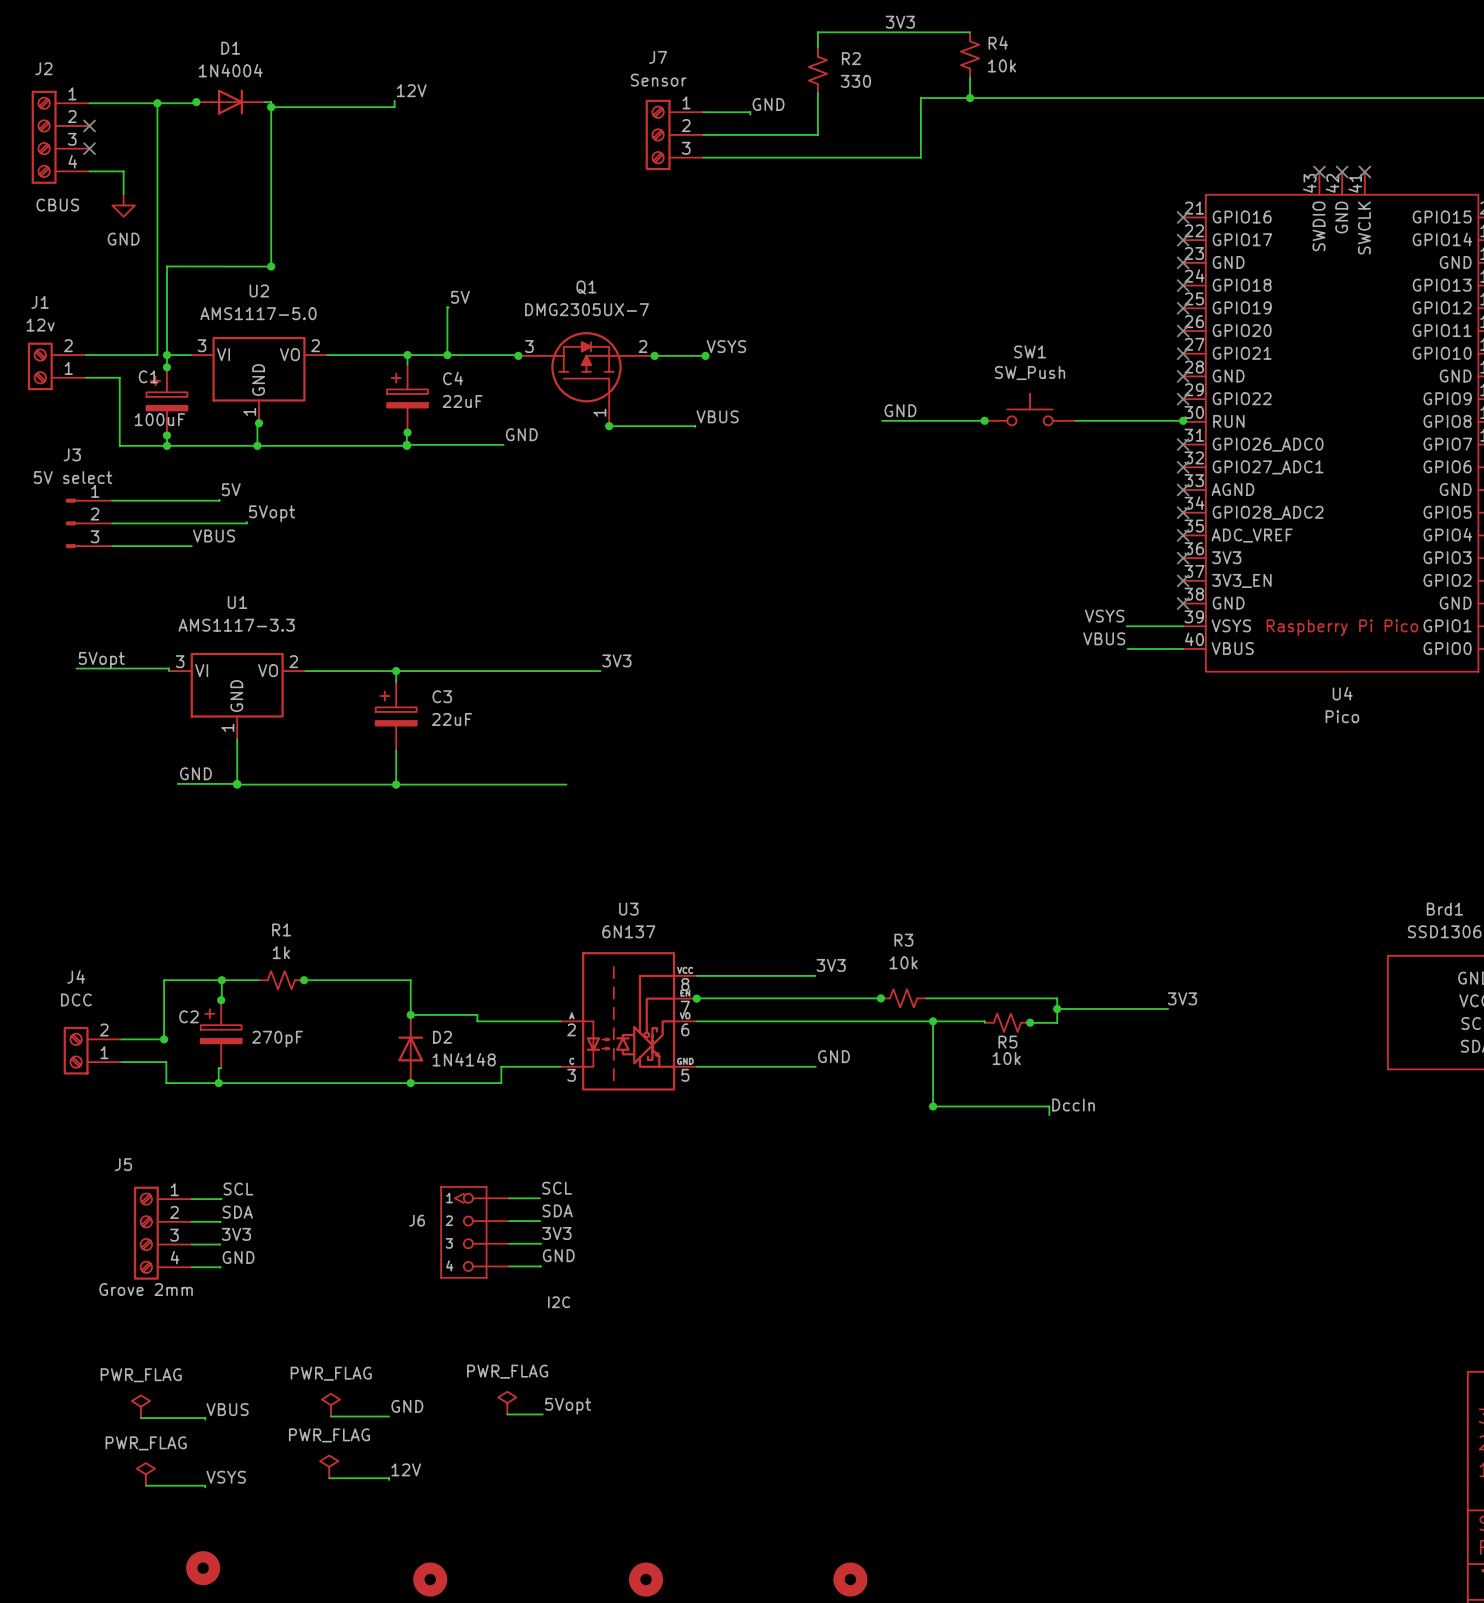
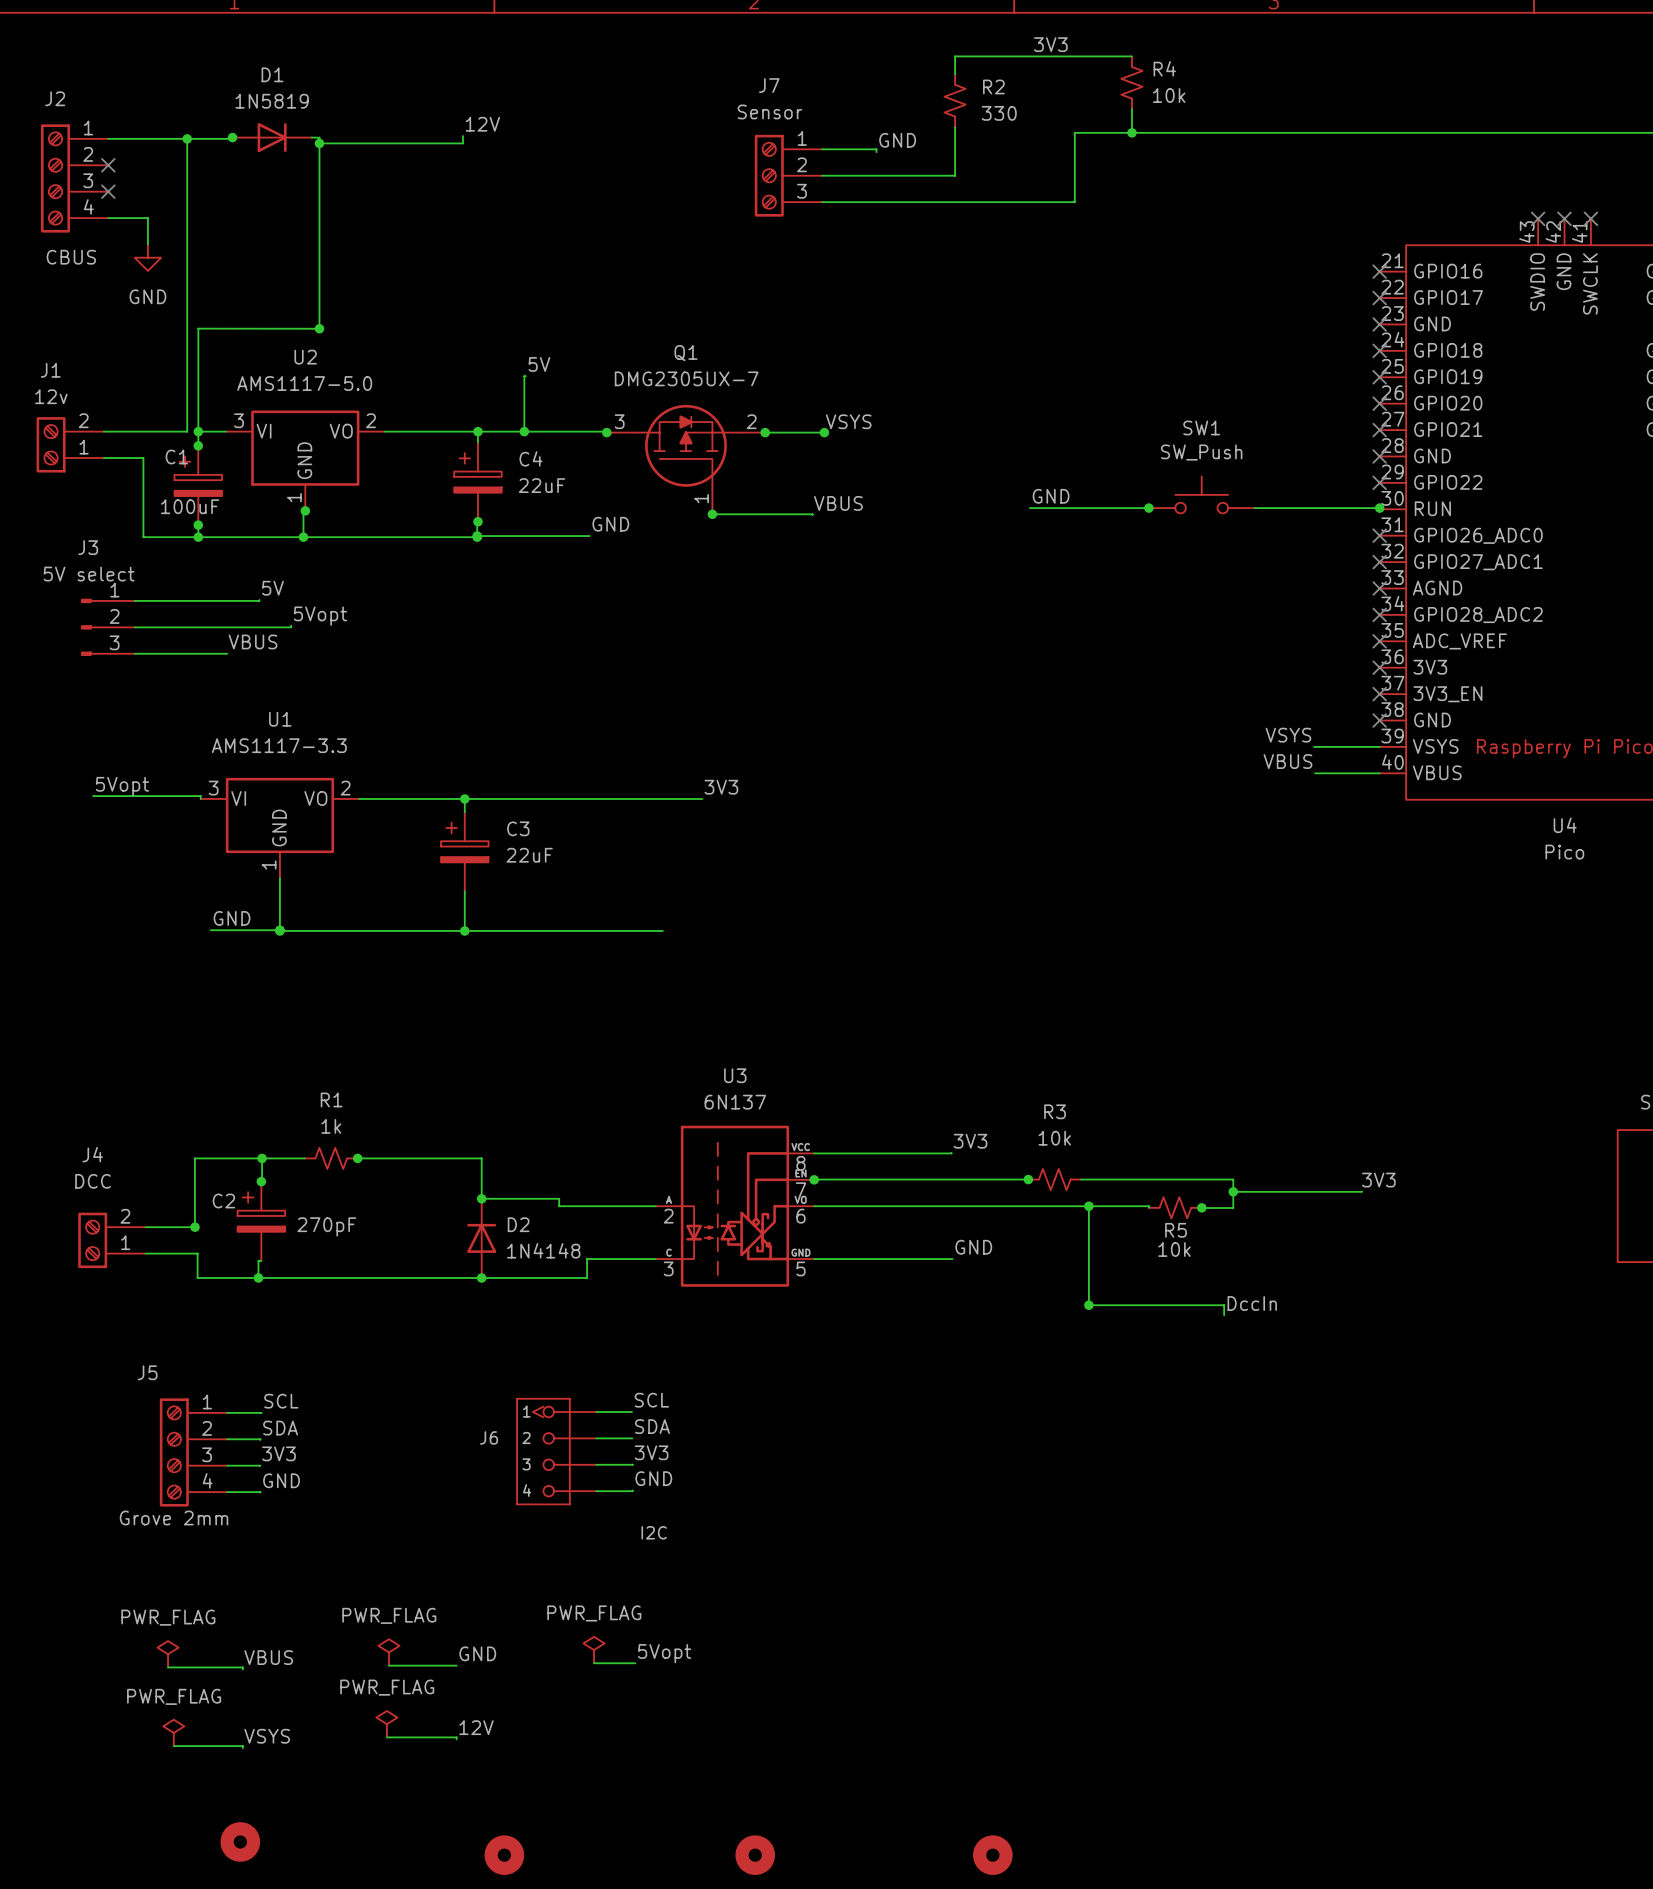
D1 value: 1N4004 (230, 70) -> 1N5819 (272, 101)

